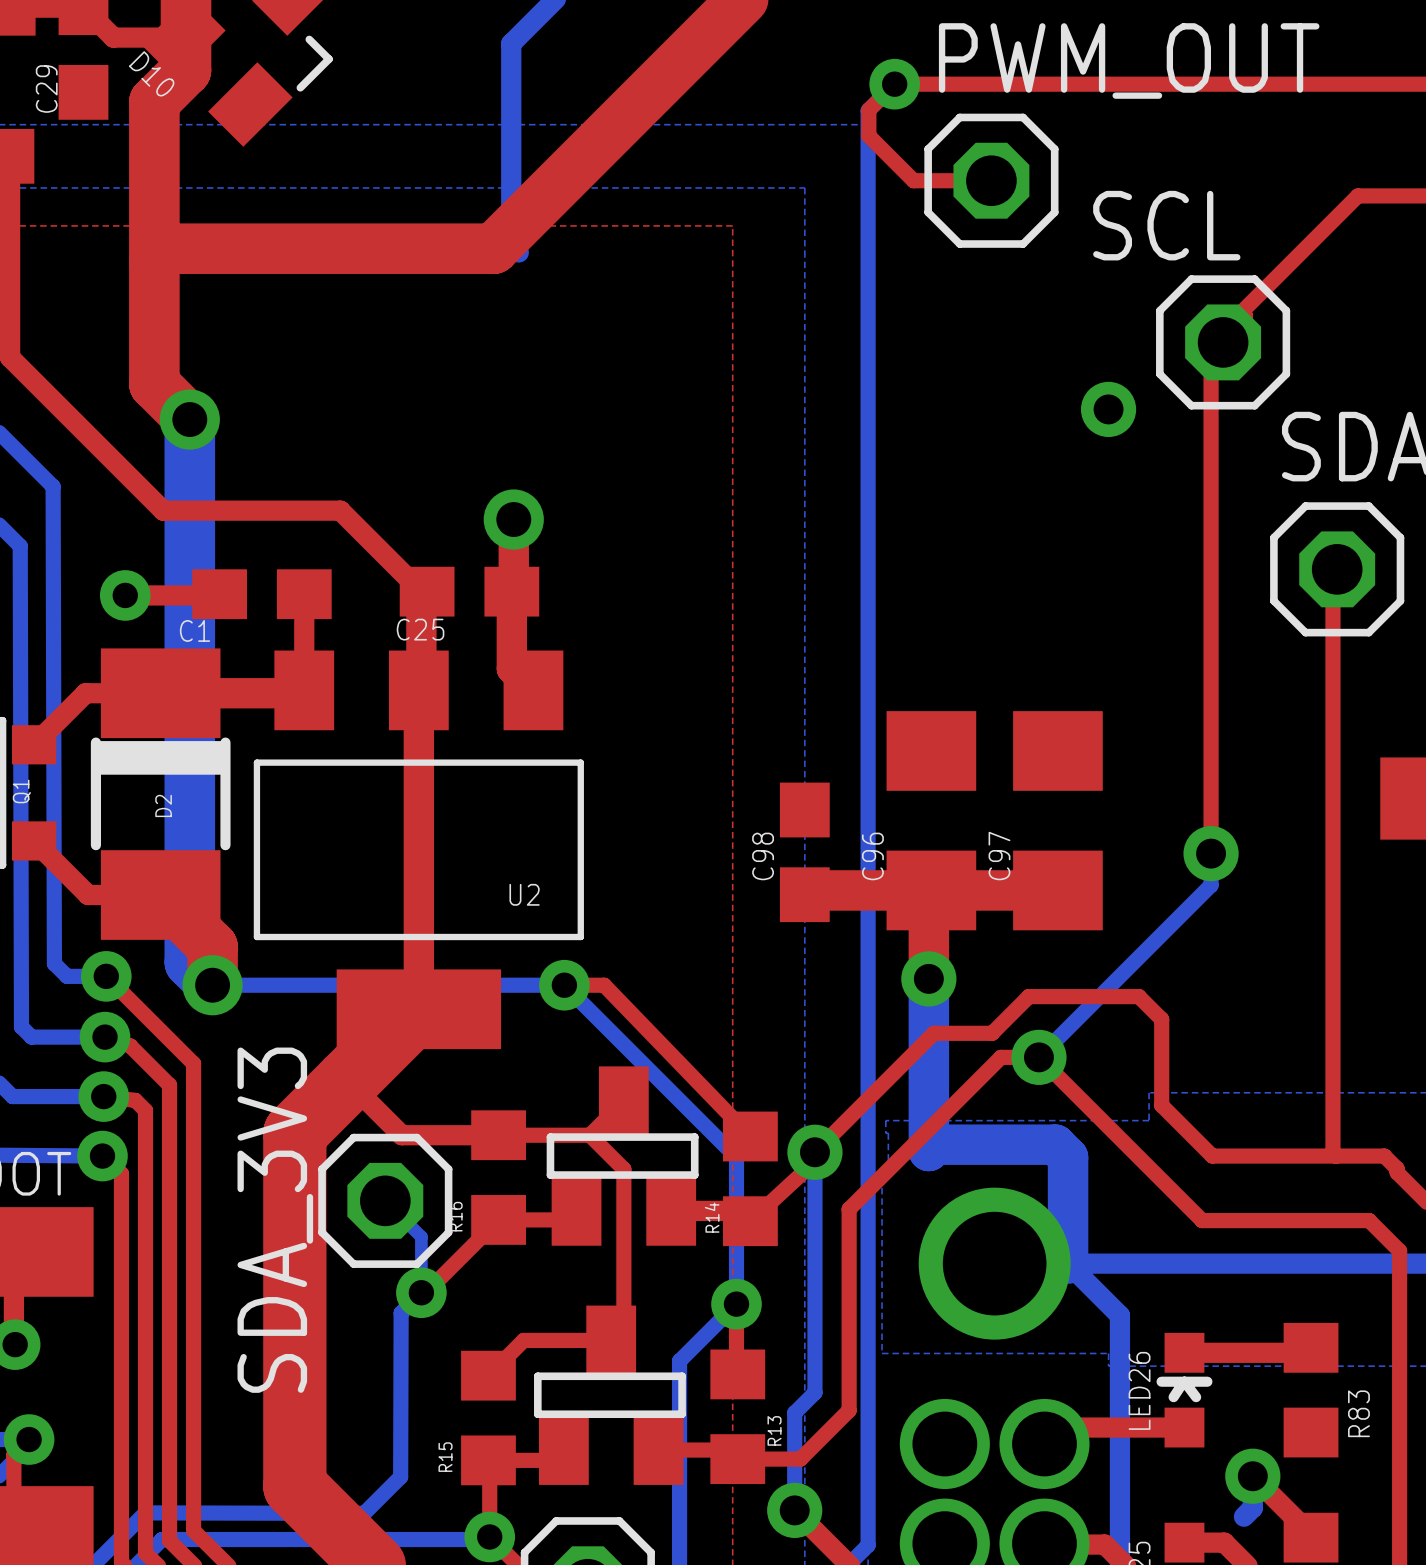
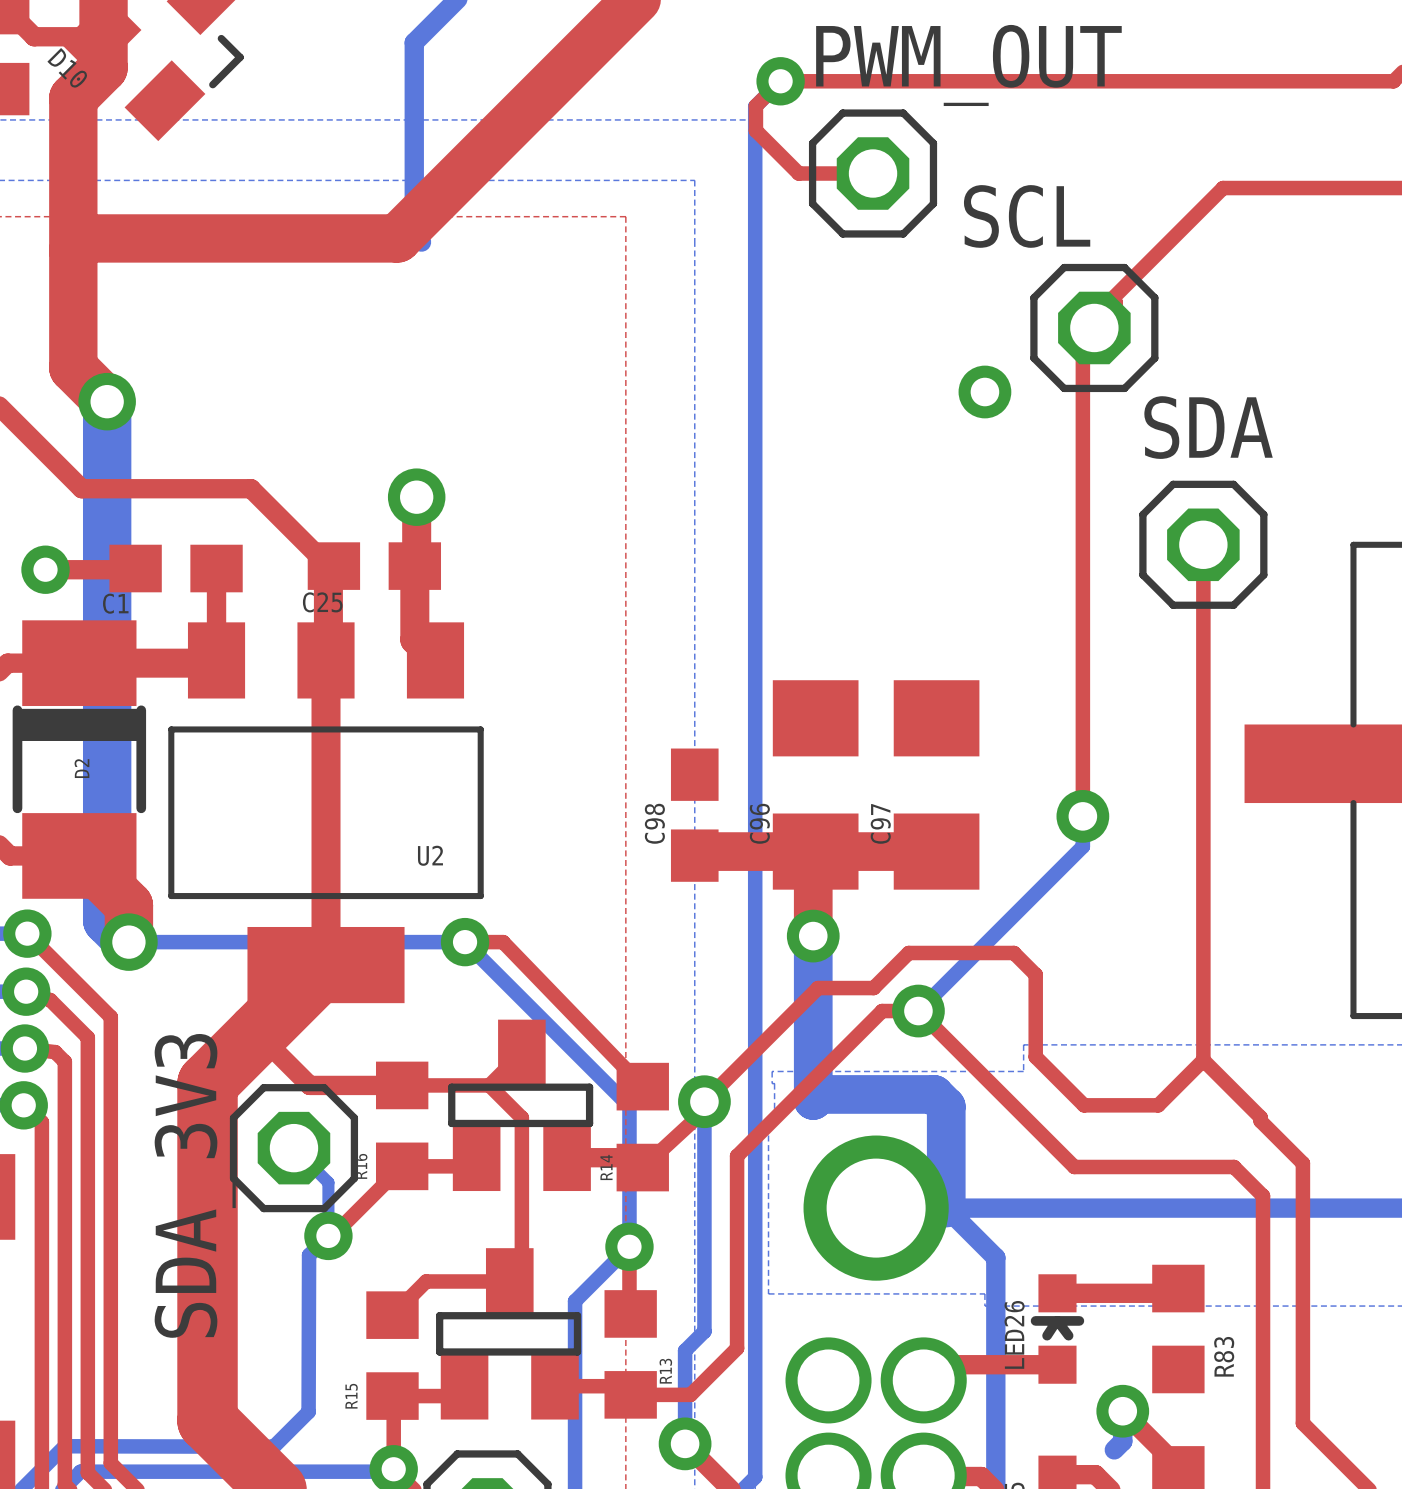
top track: (1337, 569) (1332, 573) (1332, 1153) (1335, 1156) -> (1203, 544) (1203, 1060)
top track: none -> (1203, 1060) (1248, 1105)
top track: (1289, 1156) (1384, 1156) -> (1158, 1105) (1203, 1060)

